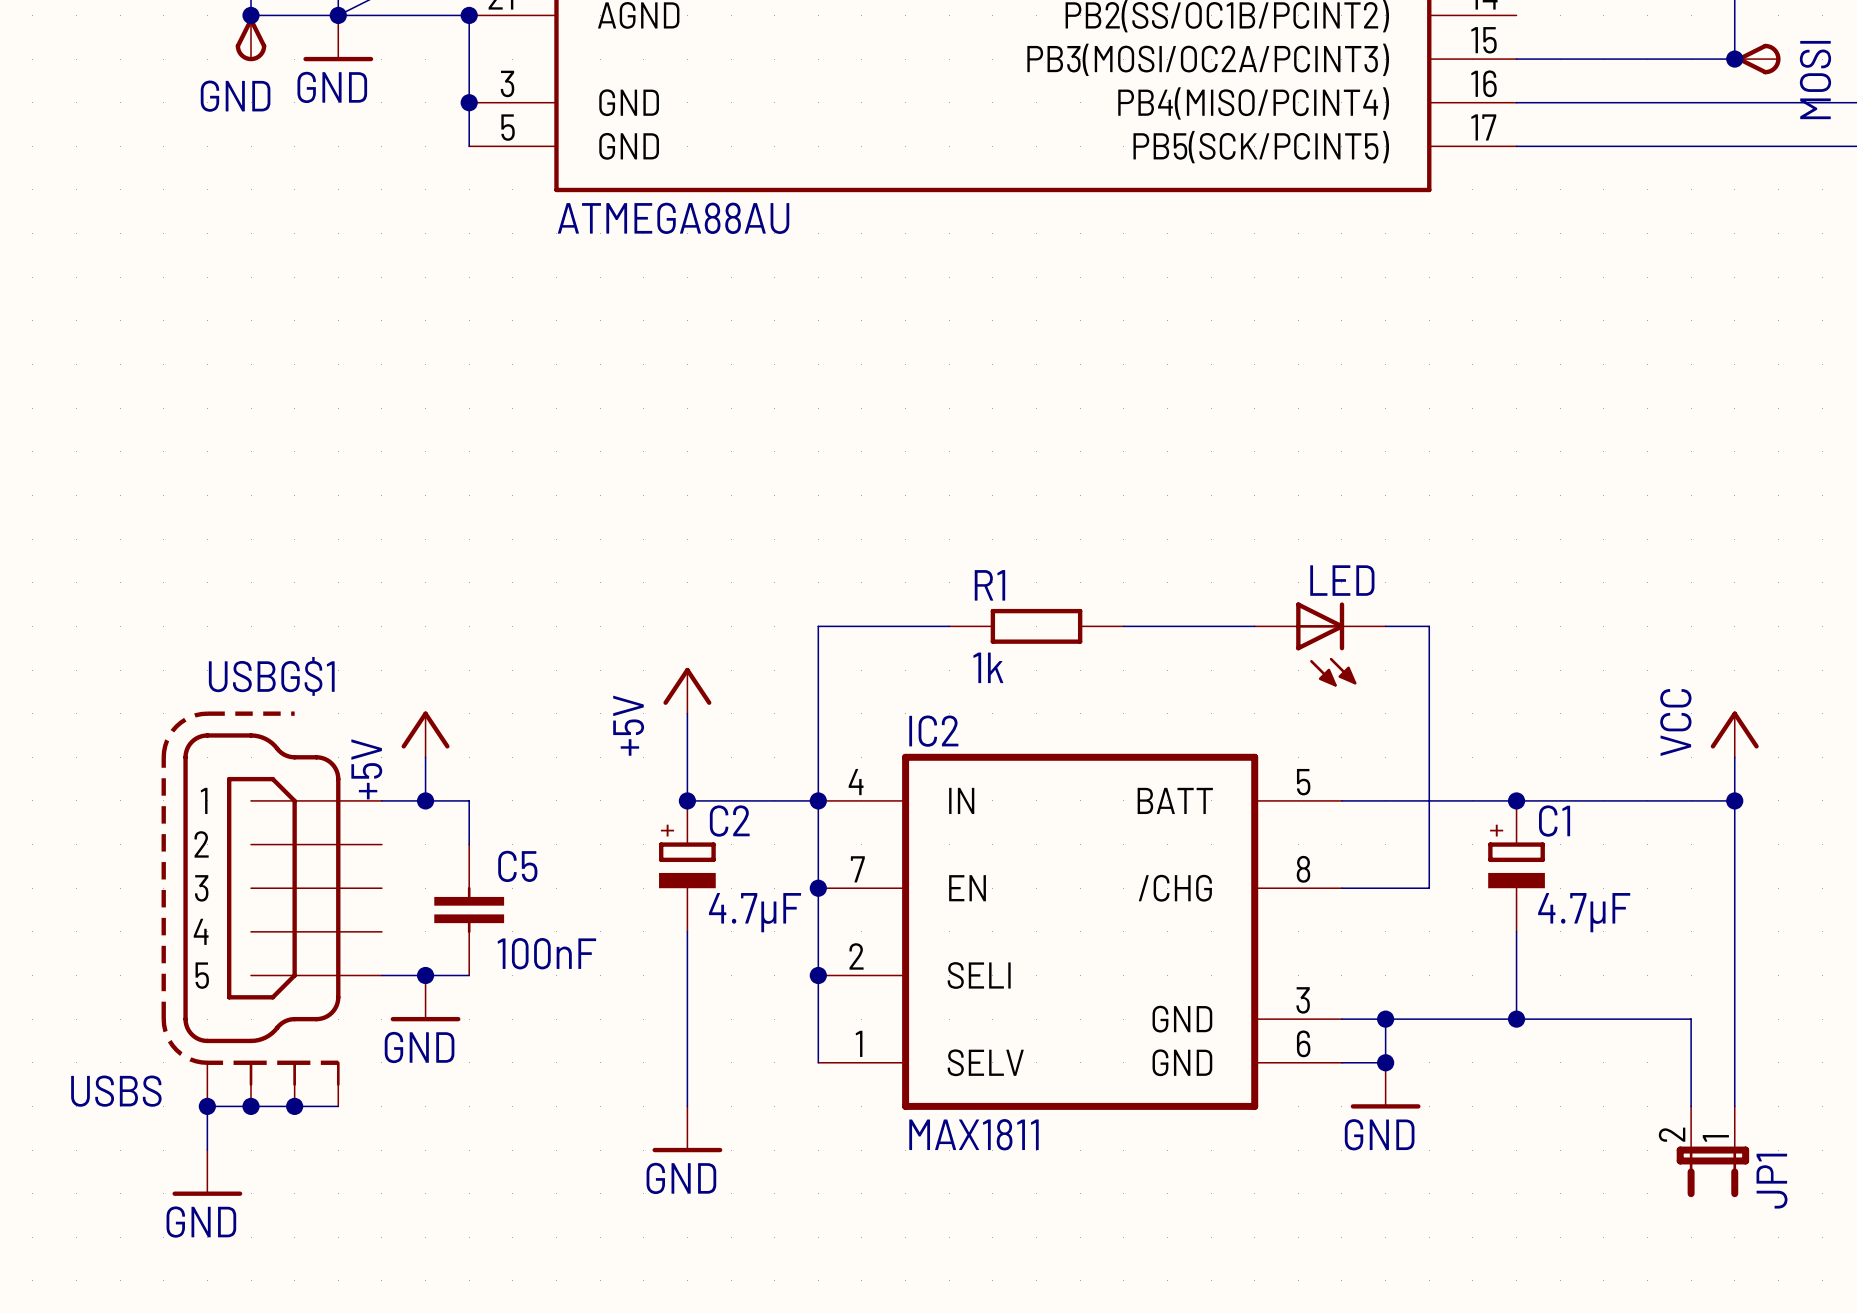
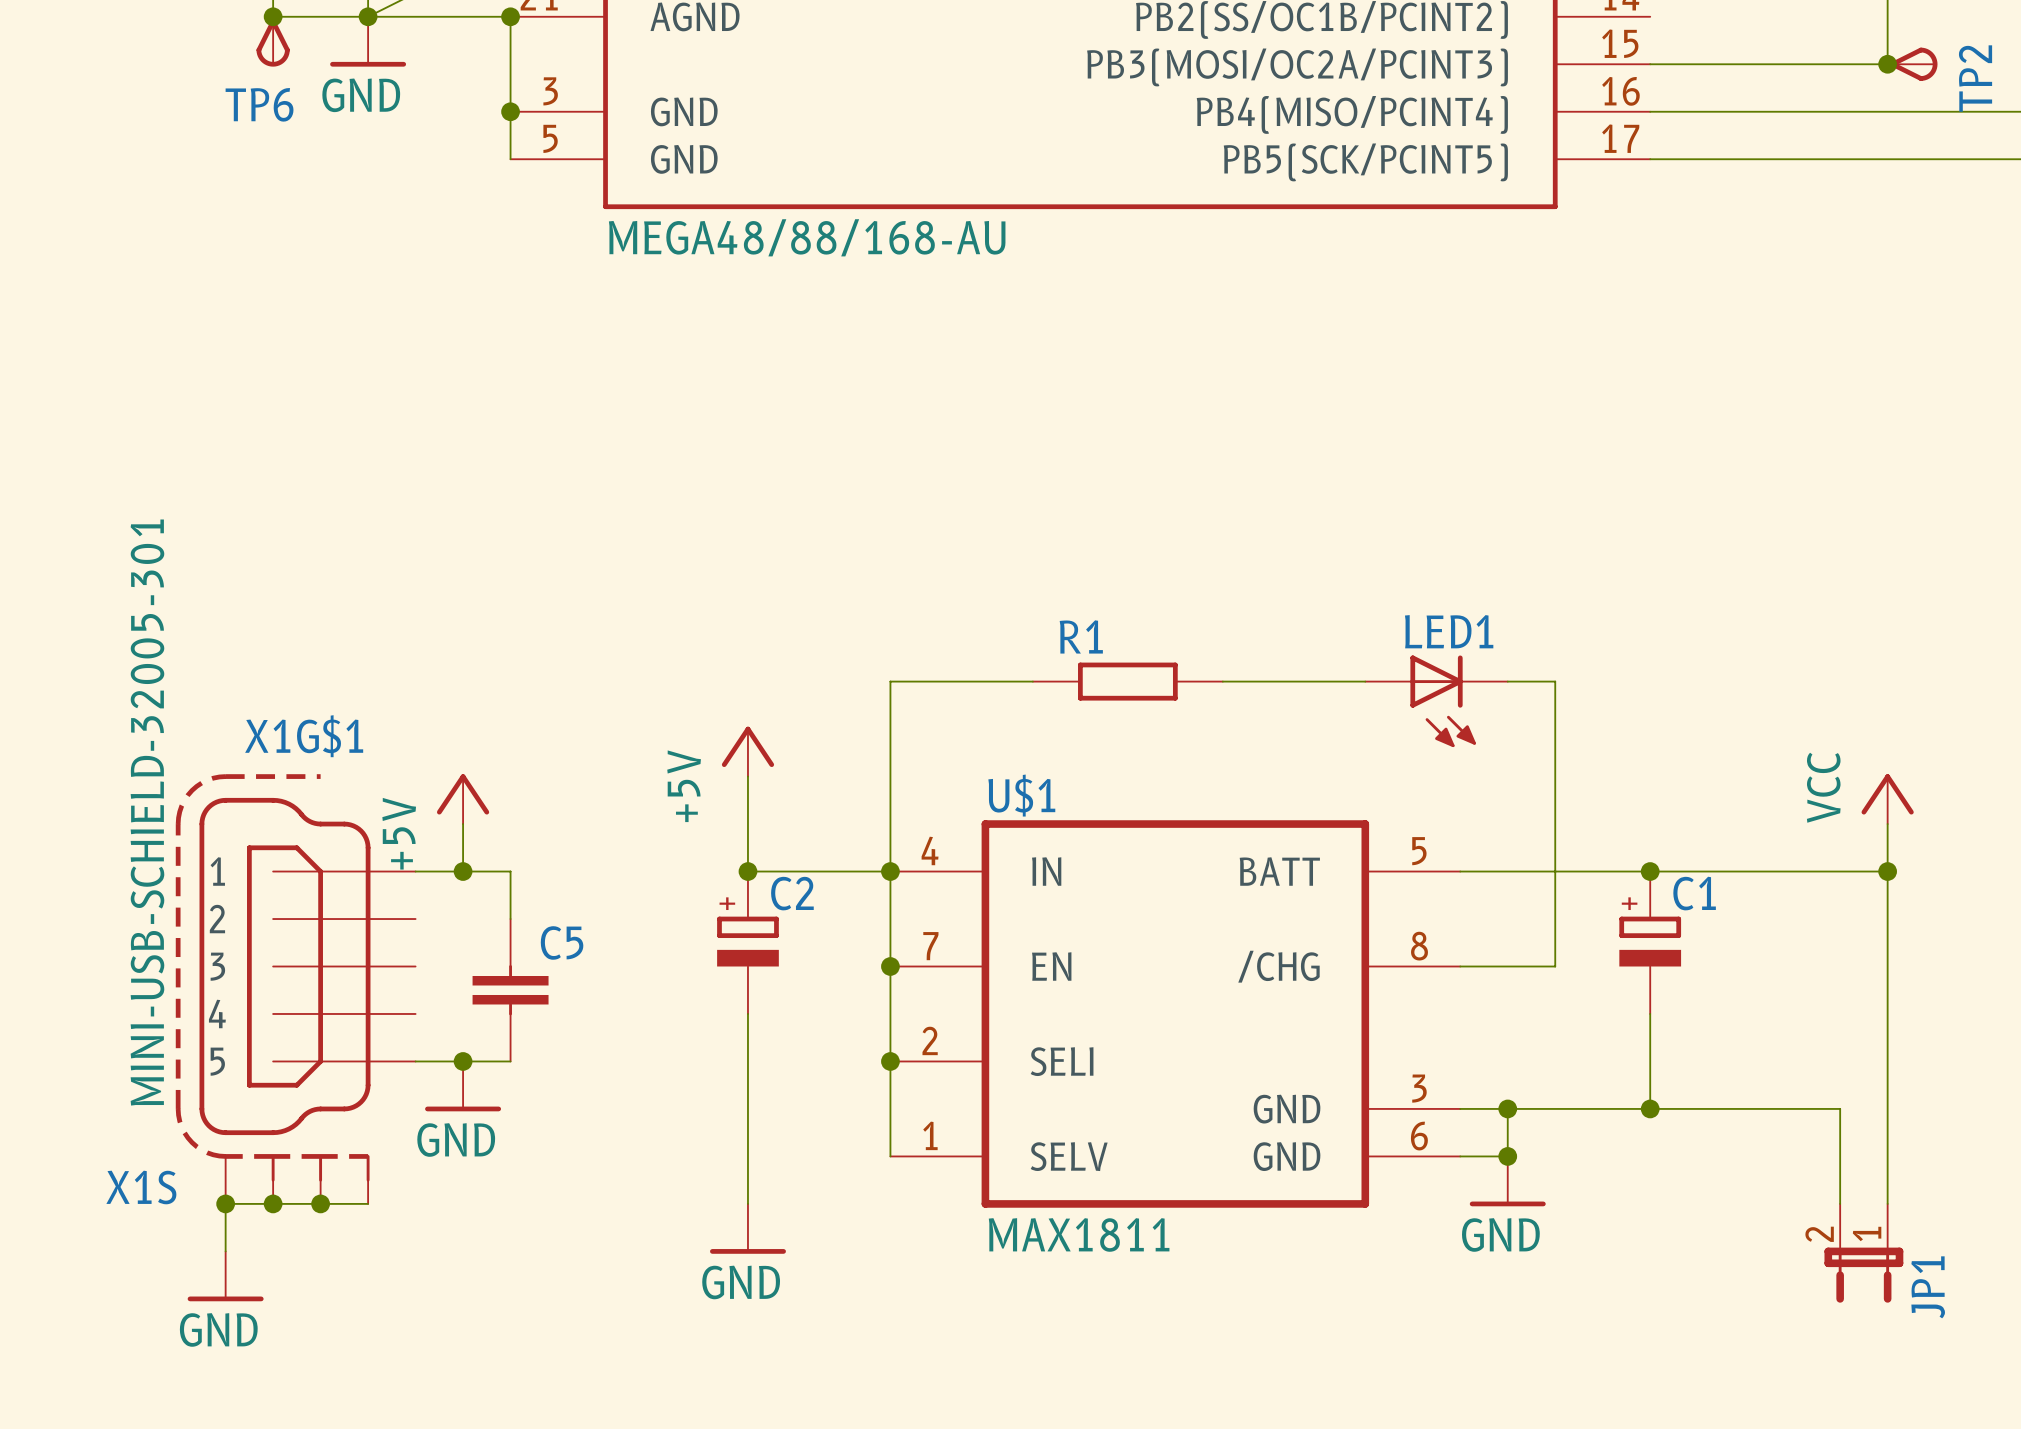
MOSI name: MOSI (1815, 80) -> TP2 (1975, 78)
GND name: GND (235, 96) -> TP6 (259, 104)
part value: ATMEGA88AU (673, 218) -> MEGA48/88/168-AU (807, 237)
LED name: LED (1342, 580) -> LED1 (1449, 631)
R1 value: 1k (988, 667) -> none
USBG$1 name: USBG$1 (271, 676) -> X1G$1 (304, 736)
IC2 name: IC2 (933, 731) -> U$1 (1021, 795)
USBG$1 value: none -> MINI-USB-SCHIELD-32005-301 (147, 812)
C2 value: 4.7μF (755, 912) -> none
C1 value: 4.7μF (1584, 912) -> none
C5 value: 100nF (546, 953) -> none
USBS name: USBS (116, 1091) -> X1S (141, 1187)

